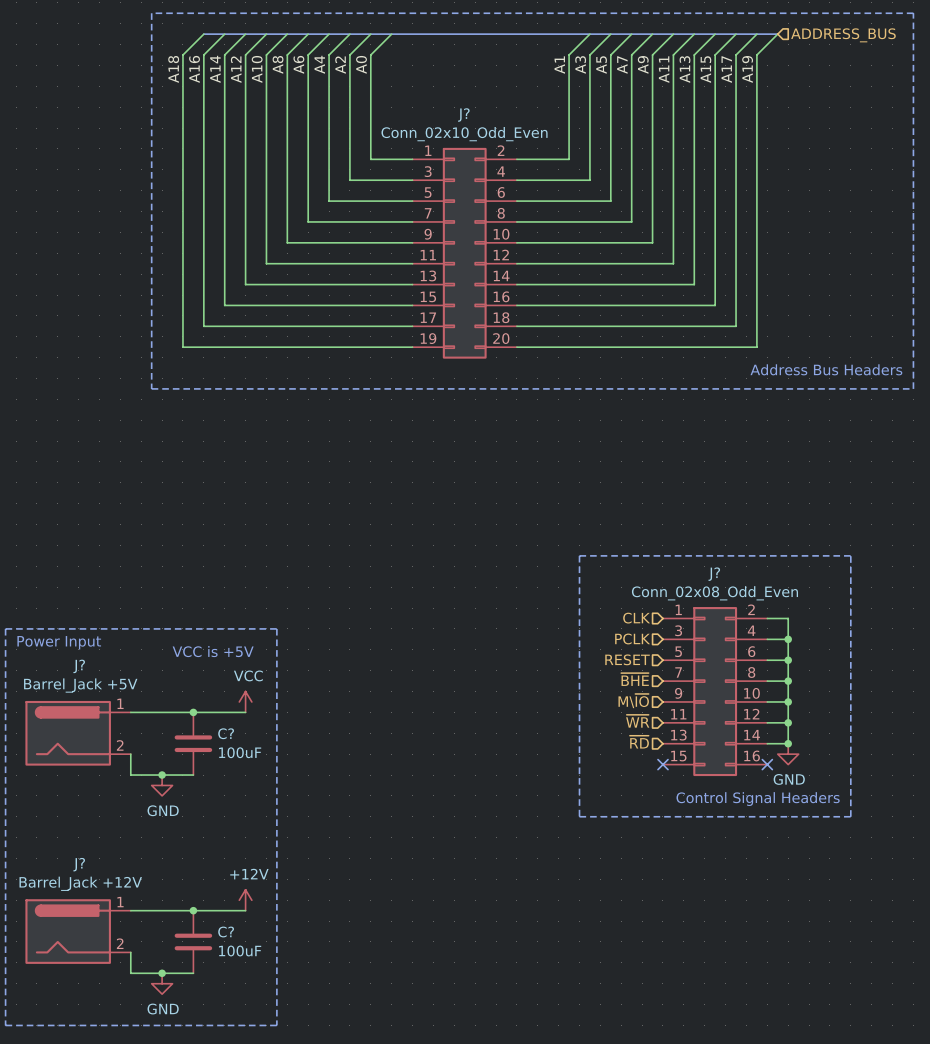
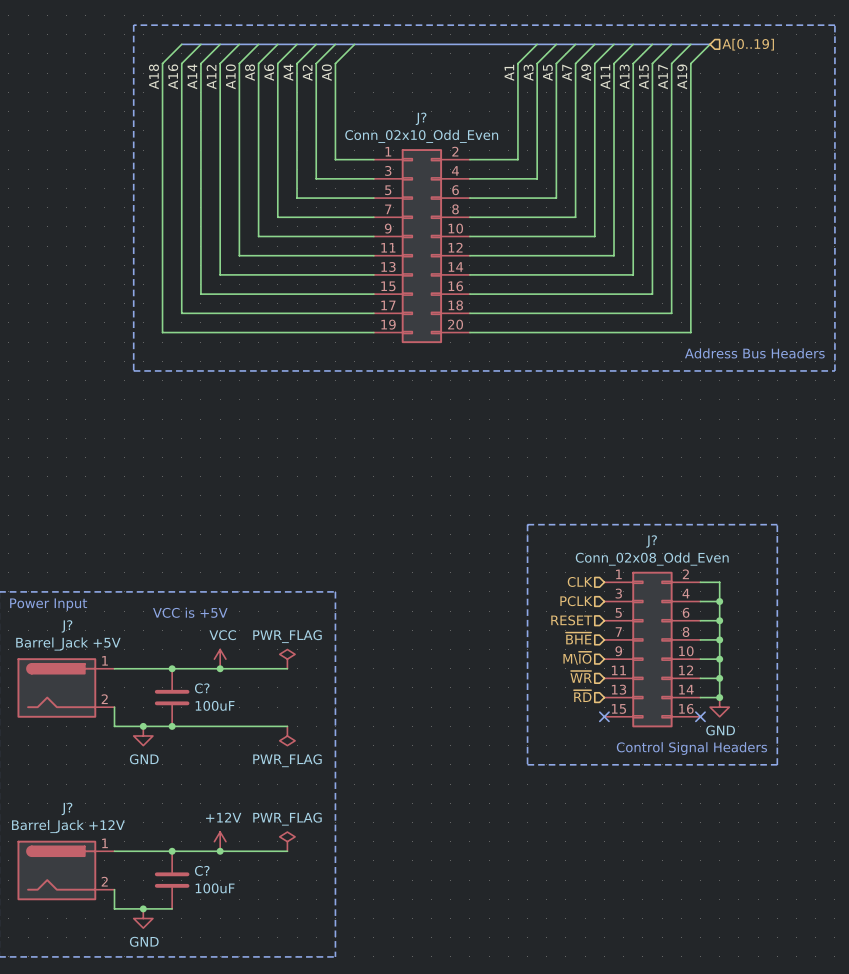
hierarchical label: ADDRESS_BUS (843, 35) -> A[0..19] (748, 44)
line: (276, 628) (276, 1025) -> (248, 591) (335, 591) (335, 956) (248, 956)
power symbol: none -> PWR_FLAG (287, 659)
wire: none -> (220, 668) (287, 668)
junction: none -> (220, 668)
wire: none -> (172, 726) (287, 726)
junction: none -> (172, 726)
power symbol: none -> PWR_FLAG (287, 736)
power symbol: none -> PWR_FLAG (287, 841)
wire: none -> (220, 851) (287, 851)
junction: none -> (220, 851)

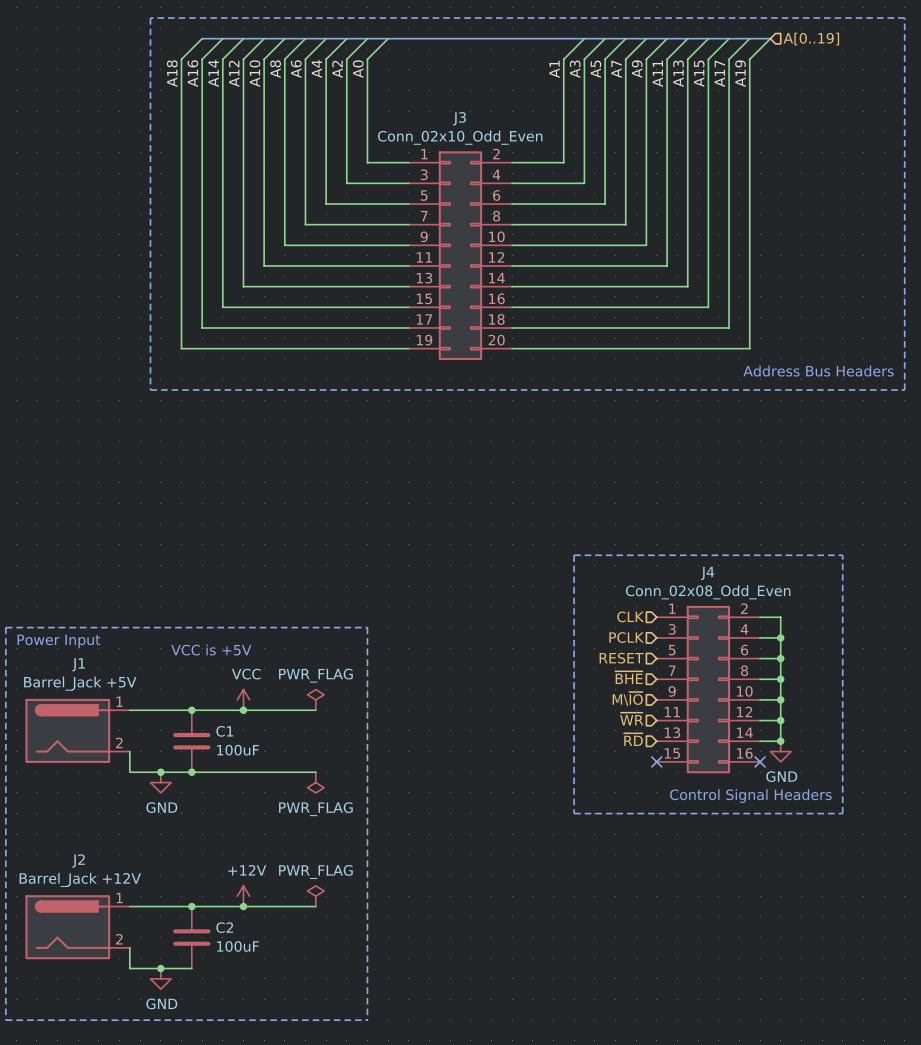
J? name: J? (421, 118) -> J3 (459, 118)
J? name: J? (651, 541) -> J4 (707, 573)
J? name: J? (67, 626) -> J1 (78, 664)
C? name: C? (202, 688) -> C1 (224, 731)
J? name: J? (67, 808) -> J2 (78, 860)
C? name: C? (202, 870) -> C2 (224, 927)

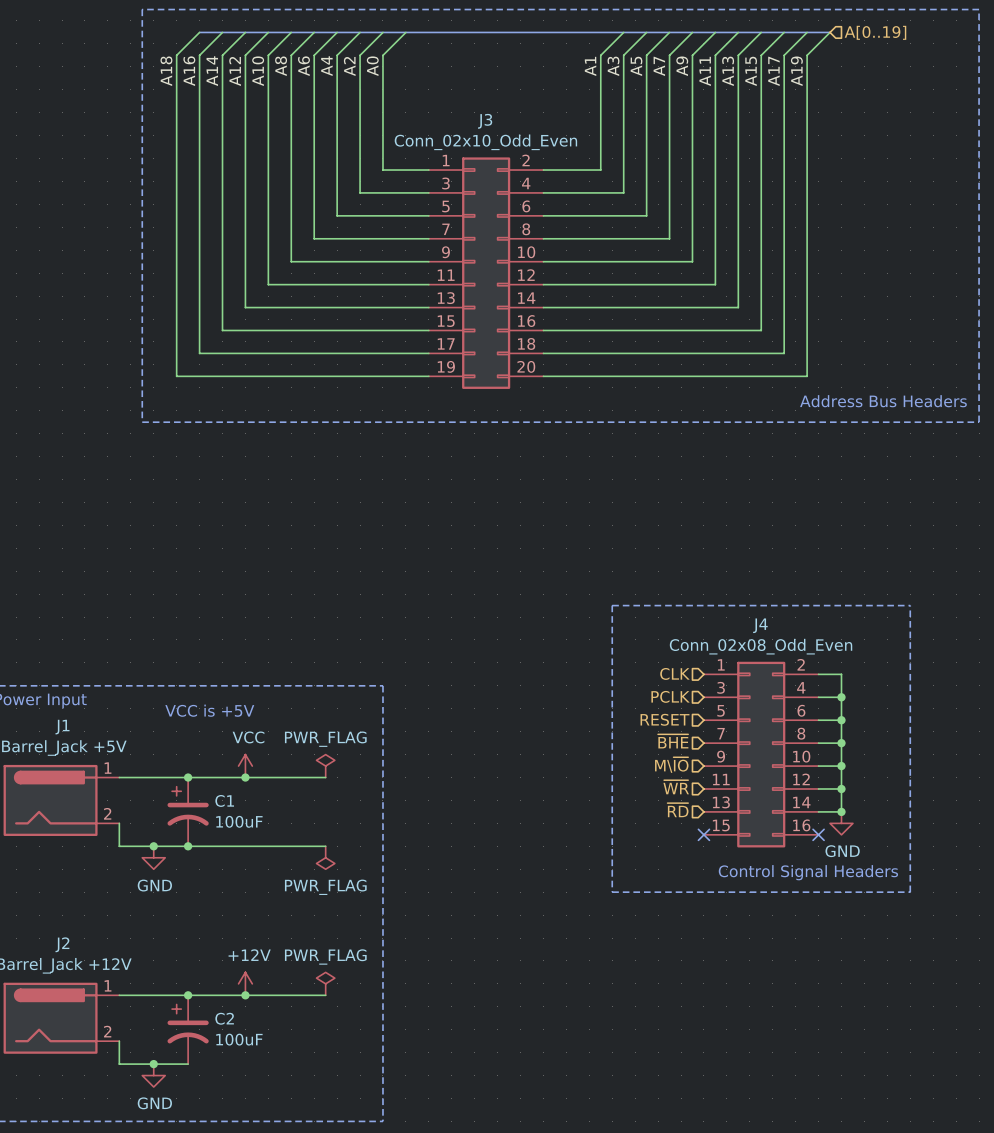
C1 symbol: [173, 710, 211, 773] -> [167, 777, 209, 847]
C2 symbol: [173, 906, 211, 969] -> [167, 995, 209, 1065]

